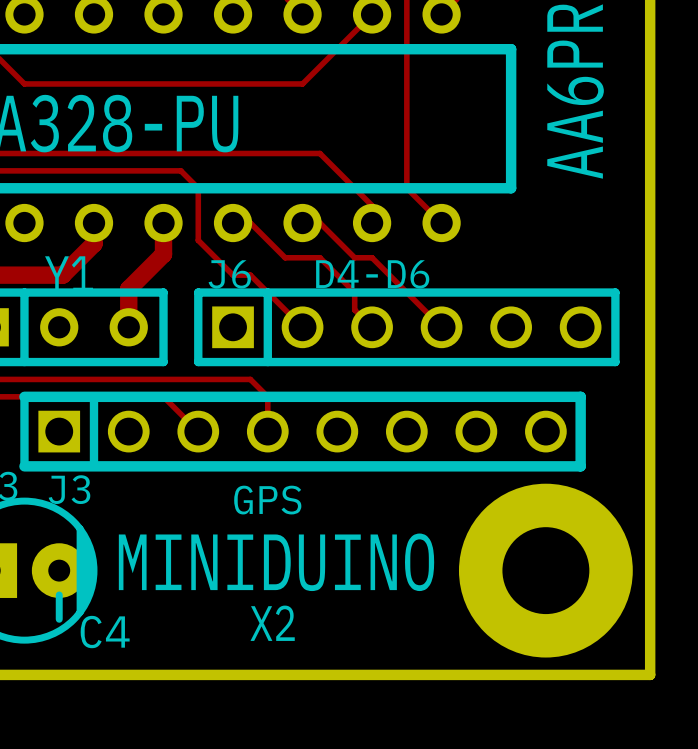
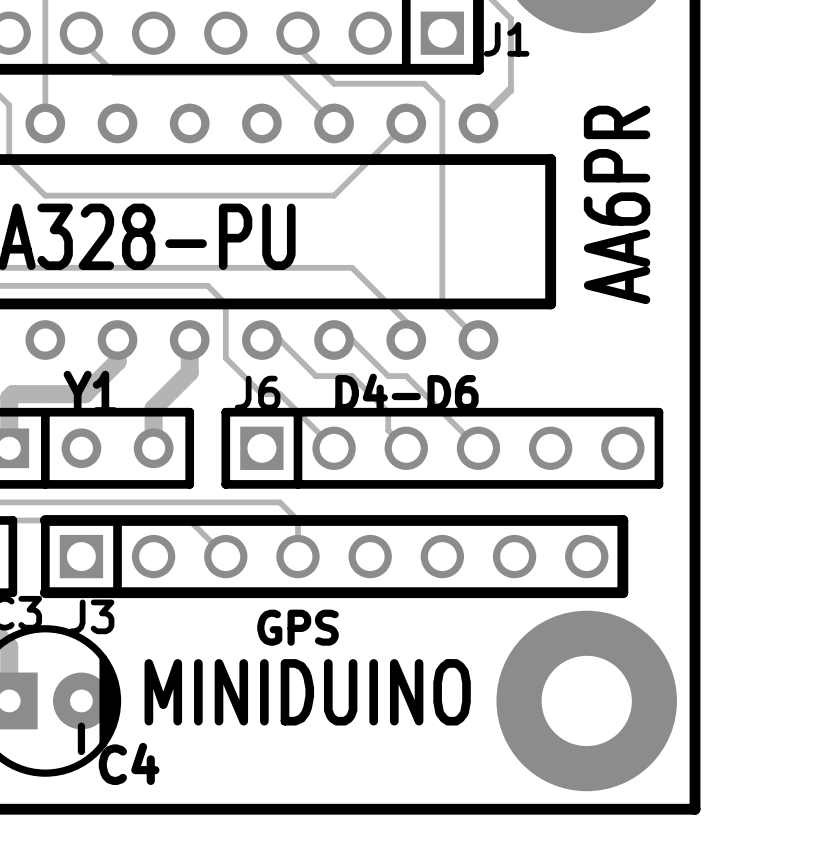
text: X2 (272, 623) -> none

